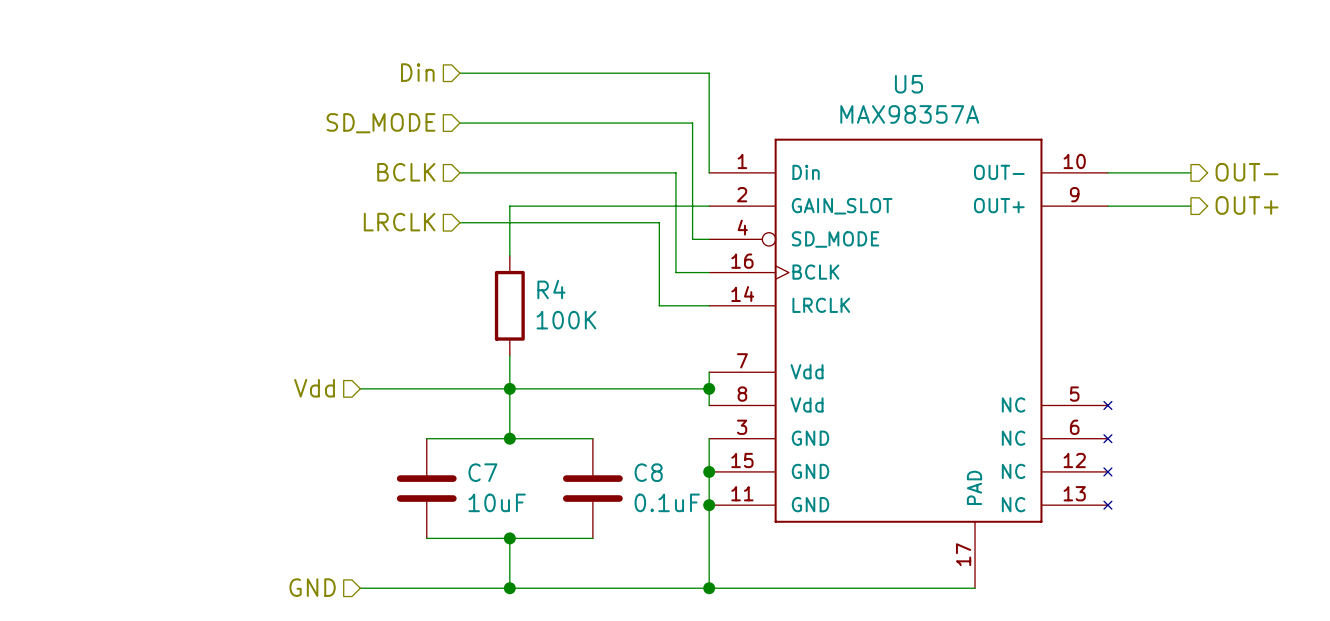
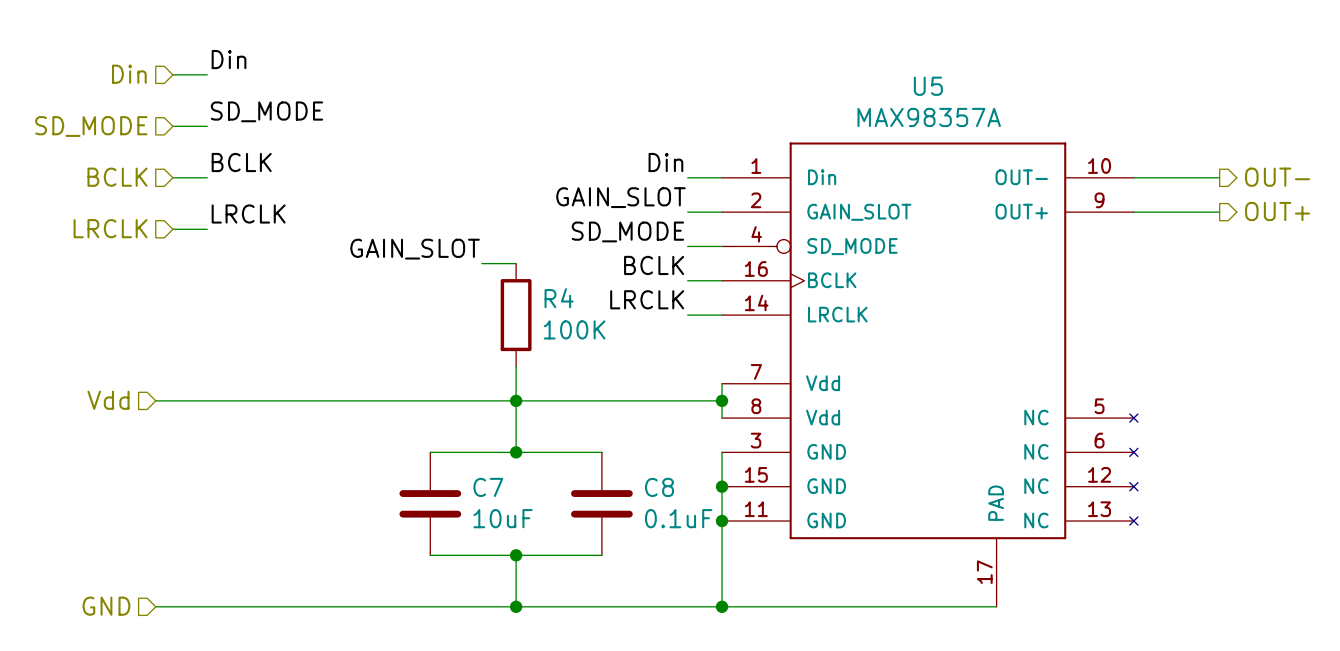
label: none -> Din (229, 59)
hierarchical label position: Din (417, 72) -> Din (129, 74)
wire: none -> (172, 74) (207, 74)
wire: (459, 73) (709, 73) (709, 172) -> (687, 177) (722, 177)
label: none -> SD_MODE (267, 111)
wire: none -> (172, 126) (207, 126)
hierarchical label position: SD_MODE (381, 123) -> SD_MODE (91, 126)
wire: (459, 123) (692, 123) (692, 239) -> (687, 246) (704, 246)
label: none -> BCLK (241, 162)
label: none -> Din (665, 162)
wire: none -> (172, 177) (207, 177)
hierarchical label position: BCLK (406, 172) -> BCLK (117, 177)
wire: (459, 172) (675, 172) (675, 272) -> none
label: none -> GAIN_SLOT (620, 197)
wire: (675, 206) (509, 206) (509, 255) -> (481, 263) (516, 263)
label: none -> LRCLK (248, 213)
wire: none -> (172, 229) (207, 229)
hierarchical label position: LRCLK (399, 222) -> LRCLK (110, 228)
wire: (459, 222) (659, 222) (659, 305) (675, 305) -> none
label: none -> SD_MODE (627, 231)
label: none -> GAIN_SLOT (415, 249)
label: none -> BCLK (654, 265)
label: none -> LRCLK (647, 299)
wire: none -> (155, 400) (361, 400)
hierarchical label position: Vdd (314, 388) -> Vdd (108, 400)
hierarchical label position: GND (312, 587) -> GND (106, 606)
wire: none -> (155, 606) (361, 606)

